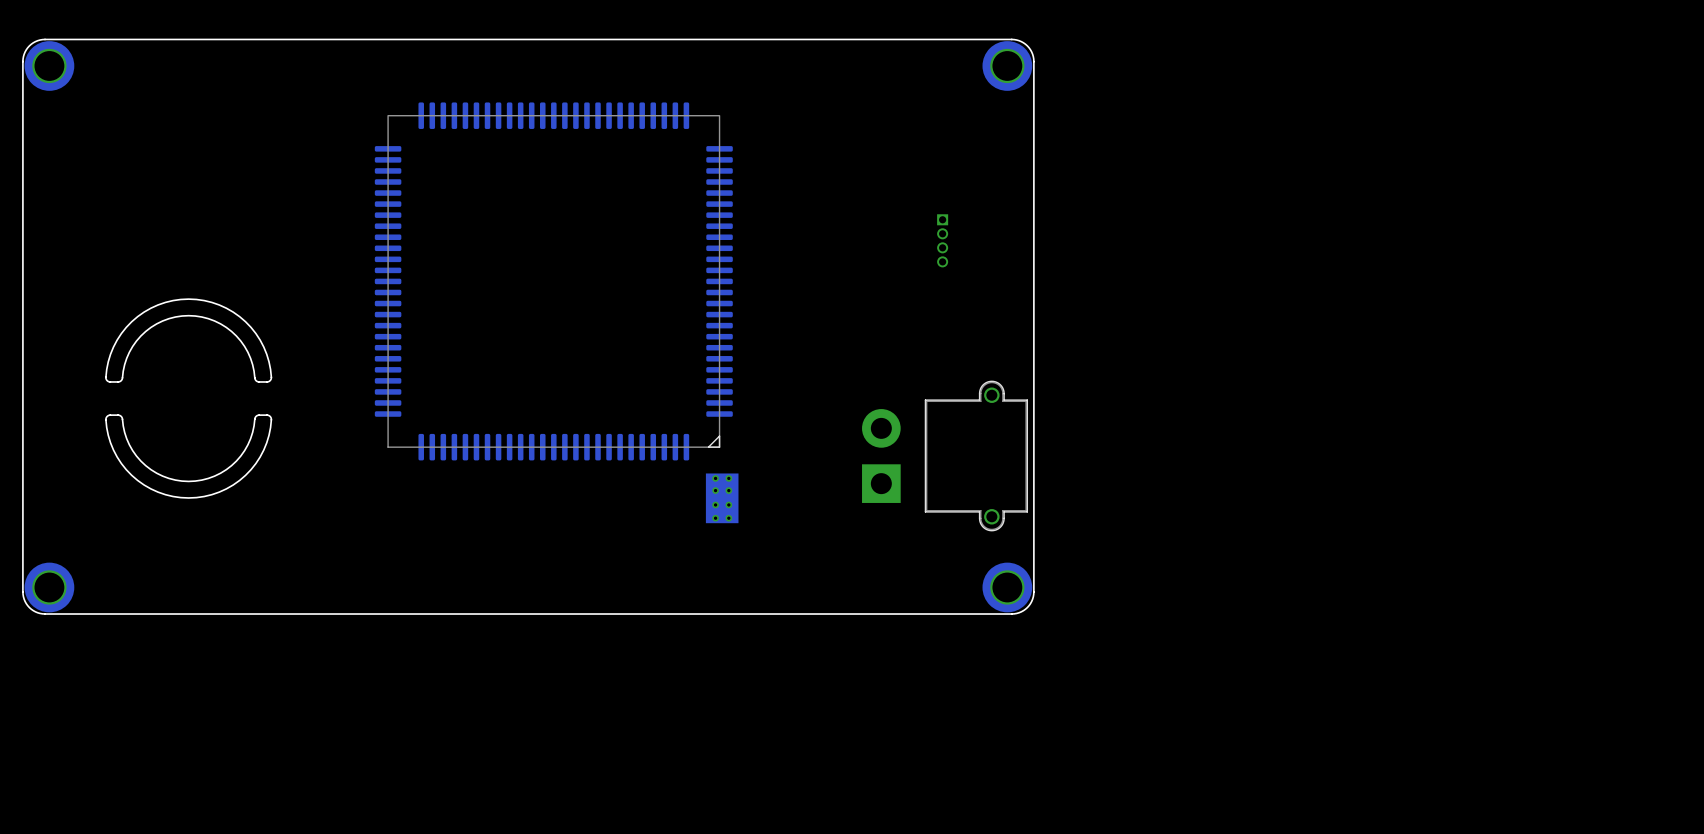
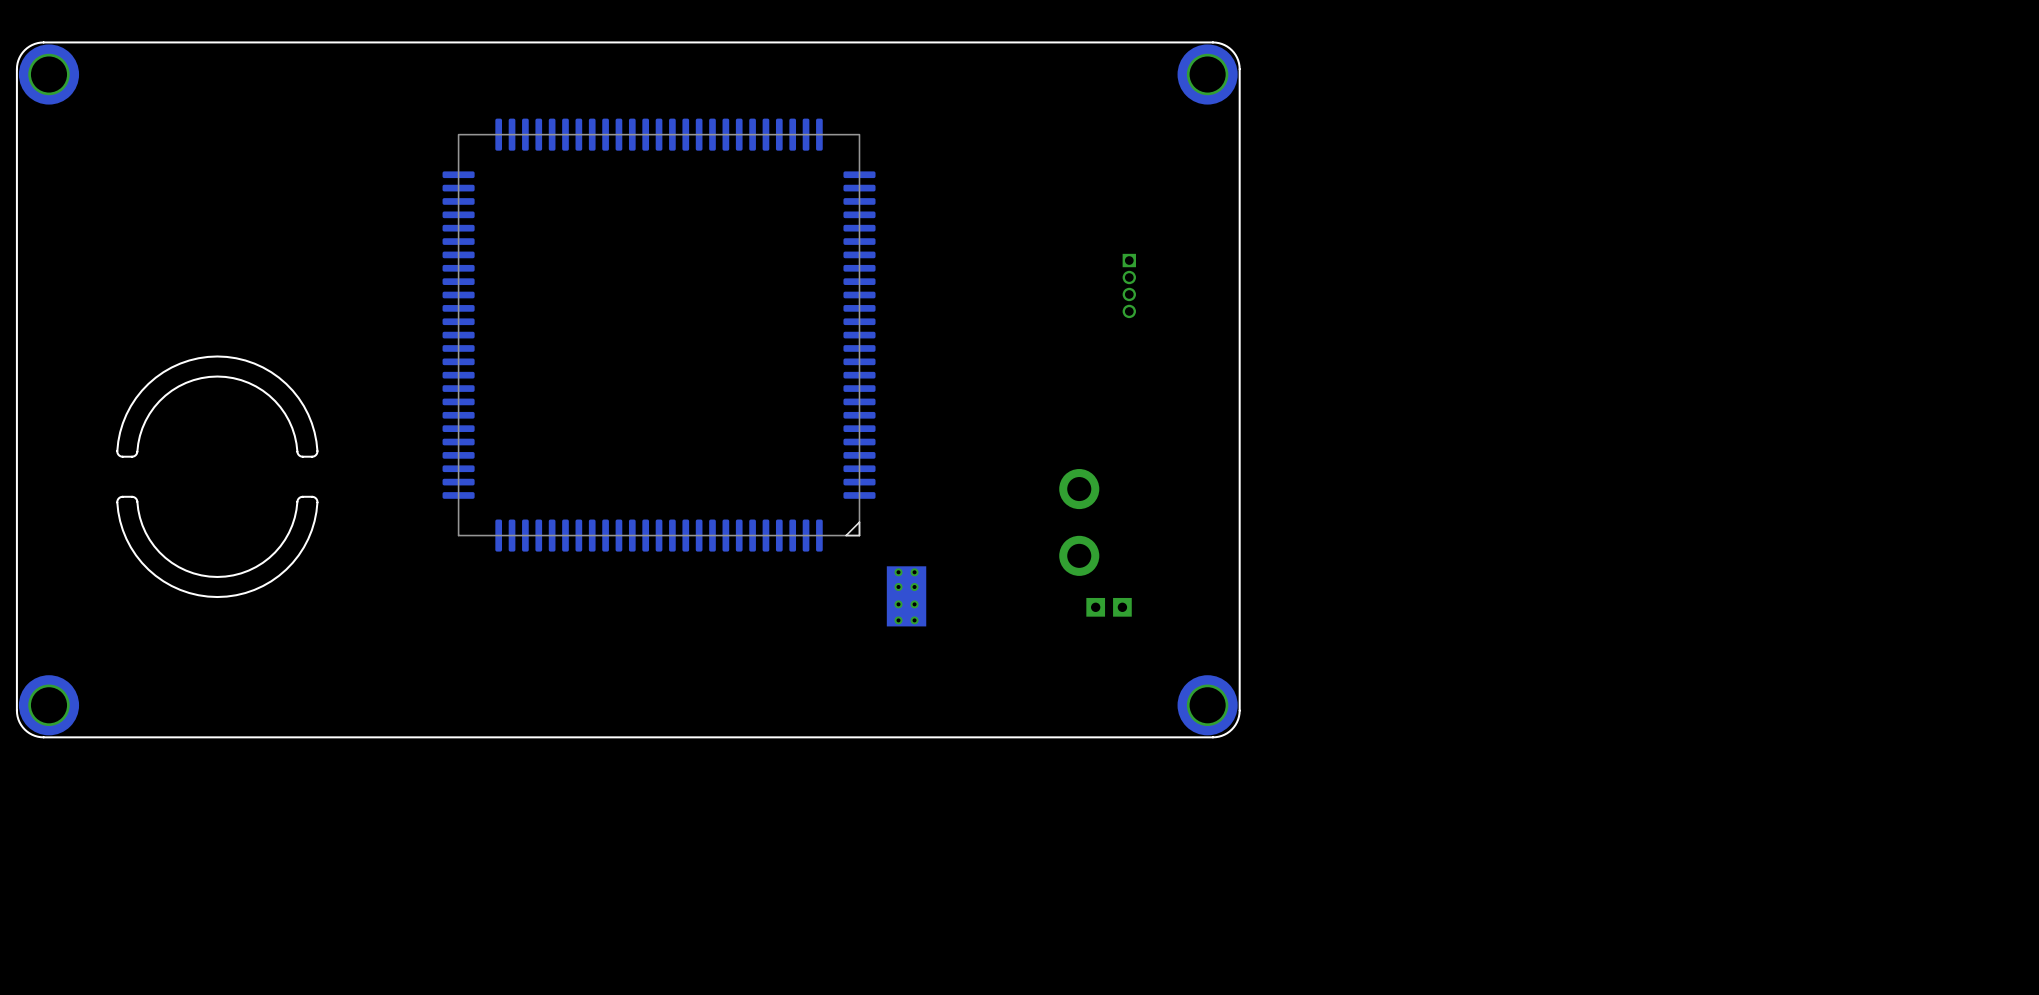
part: none -> (1095, 542)
part: (944, 456) -> none
part position: (722, 498) -> (906, 596)

